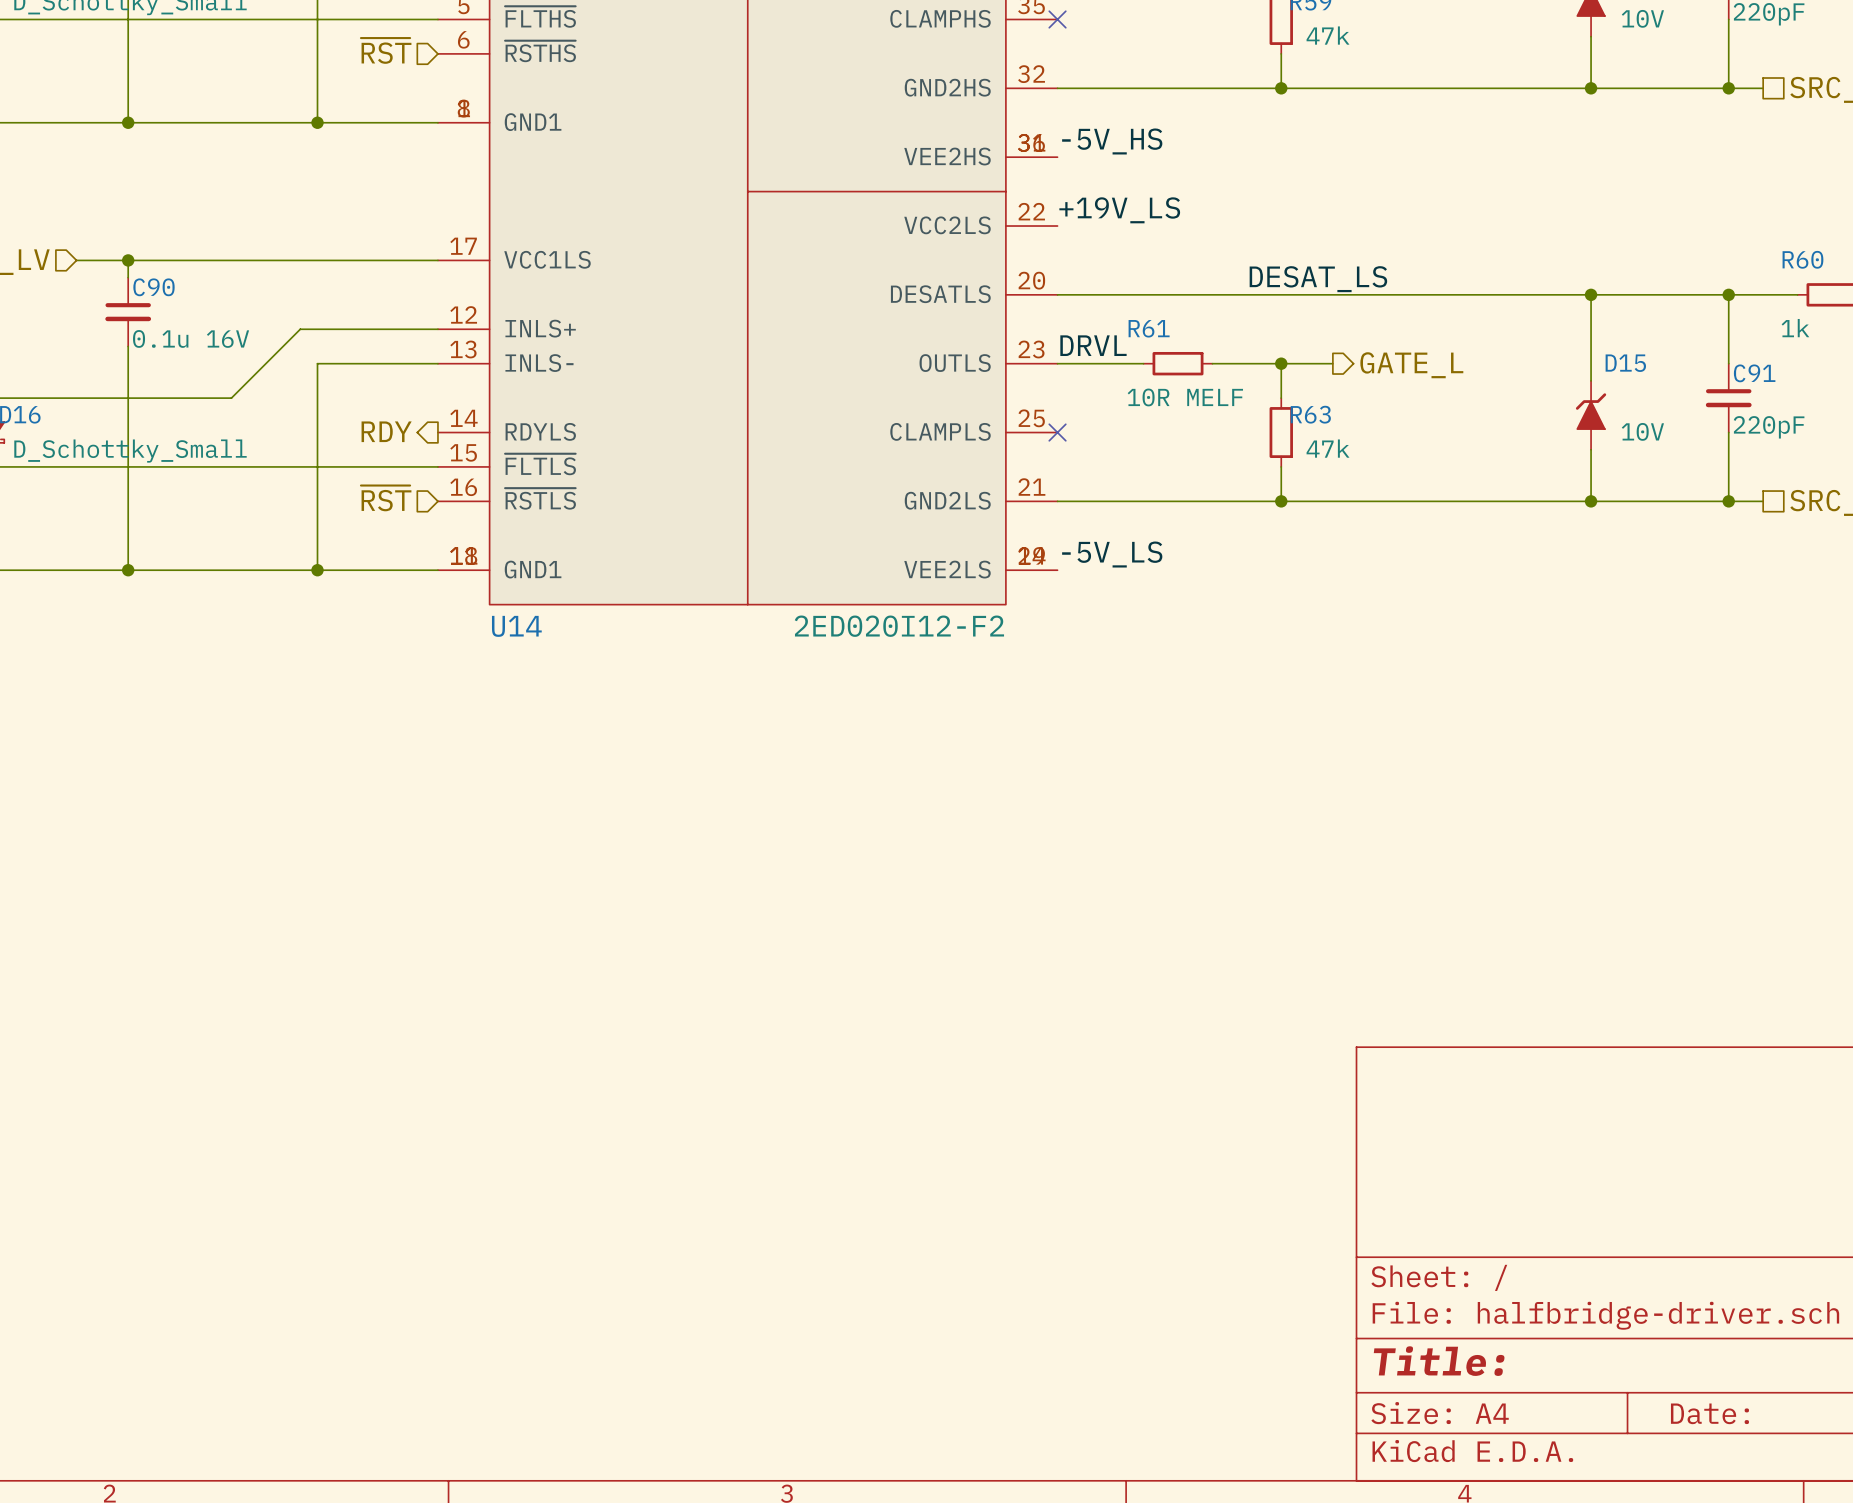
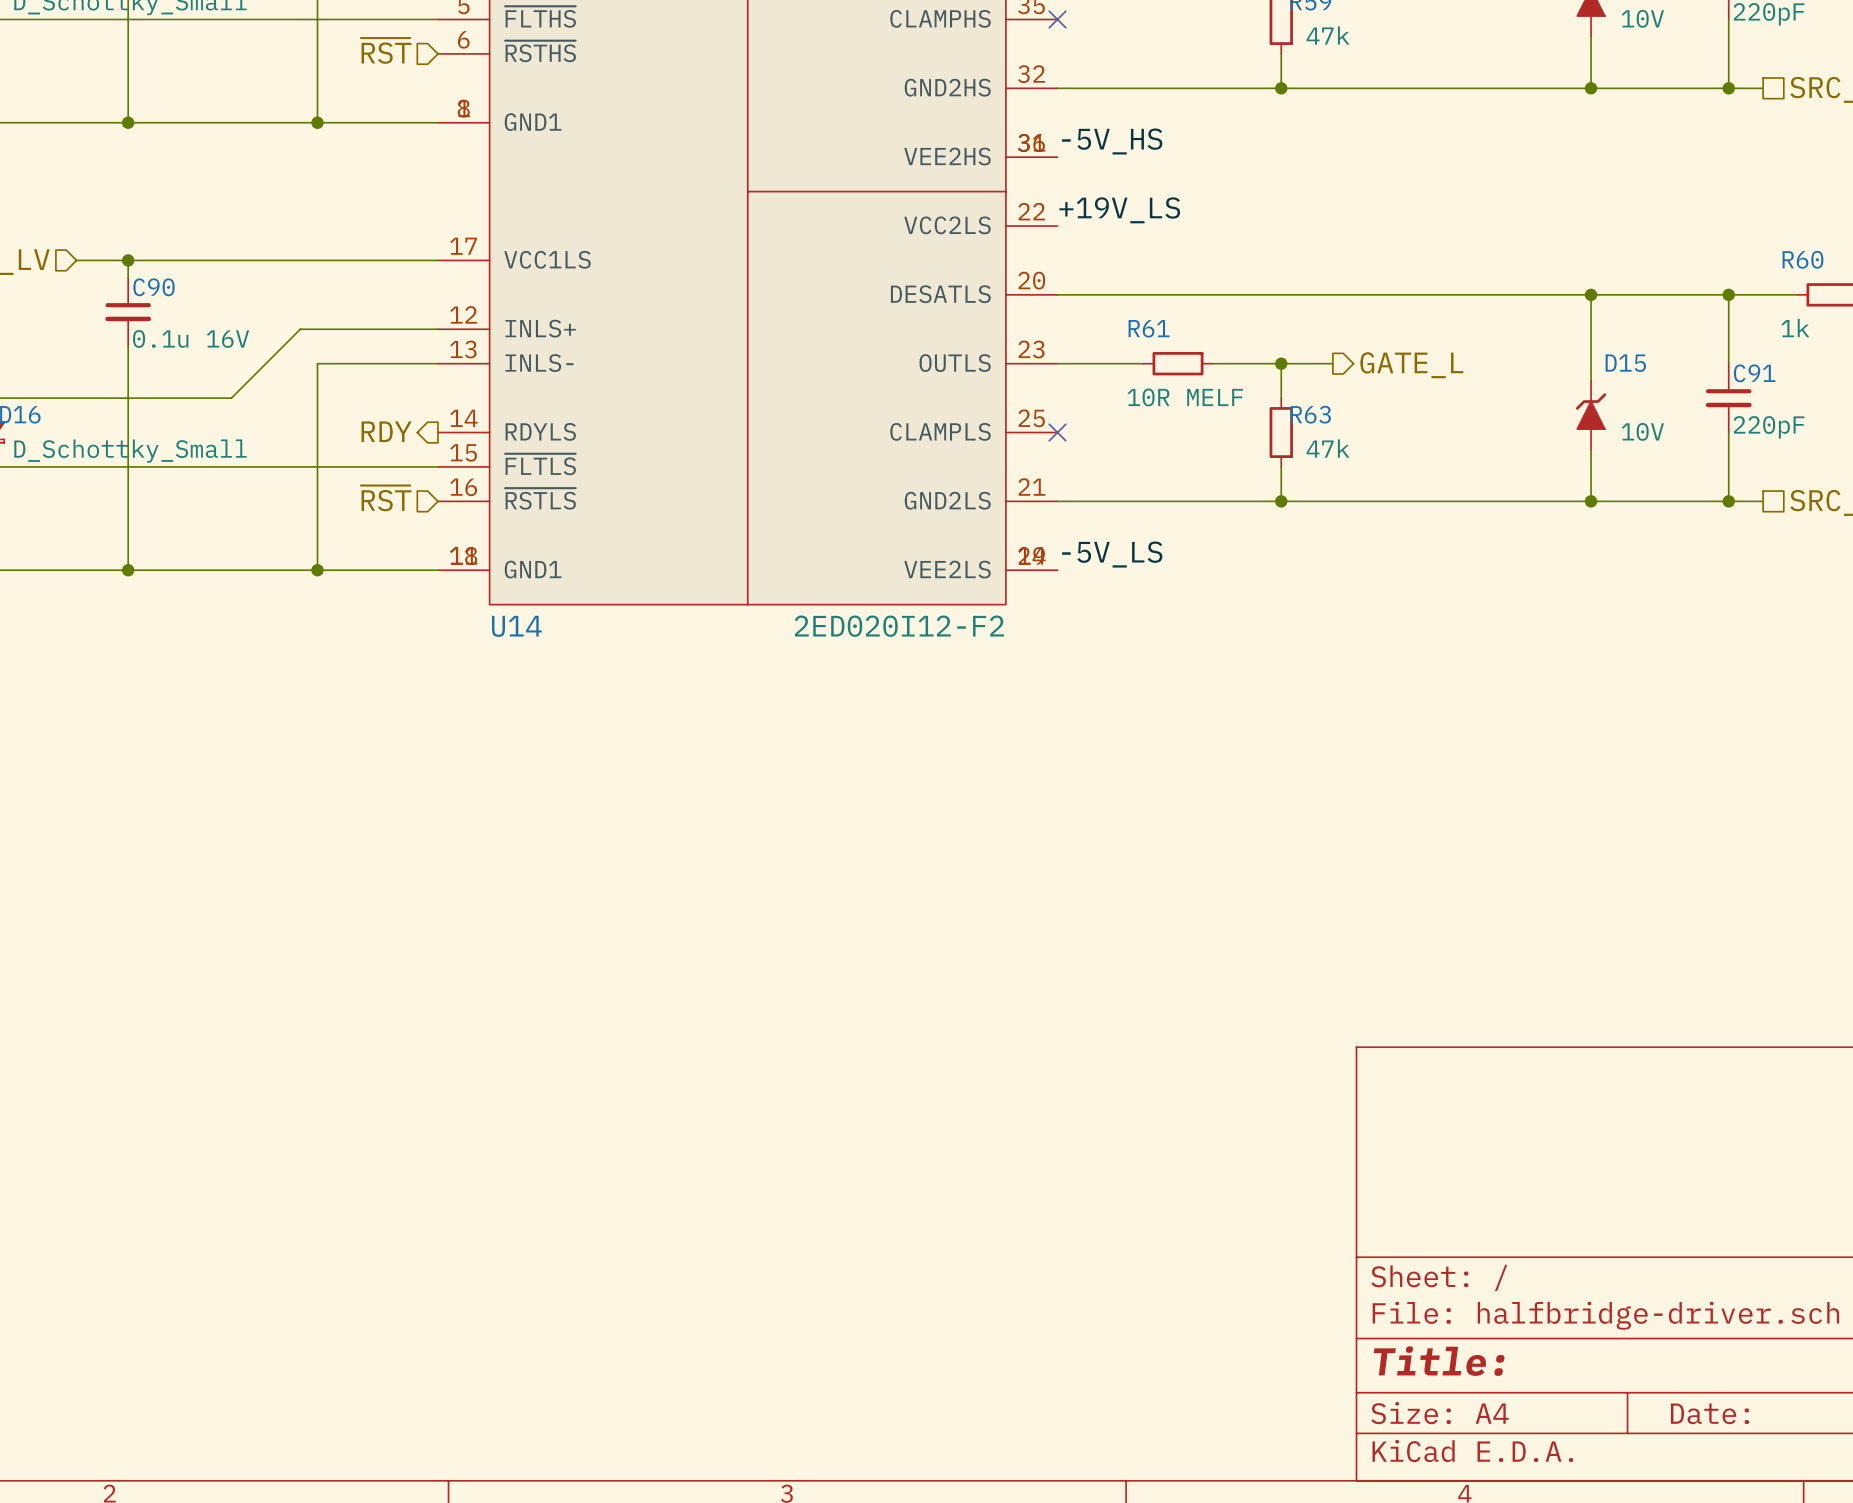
label: DESAT_LS (1318, 279) -> none
label: DRVL (1093, 345) -> none

